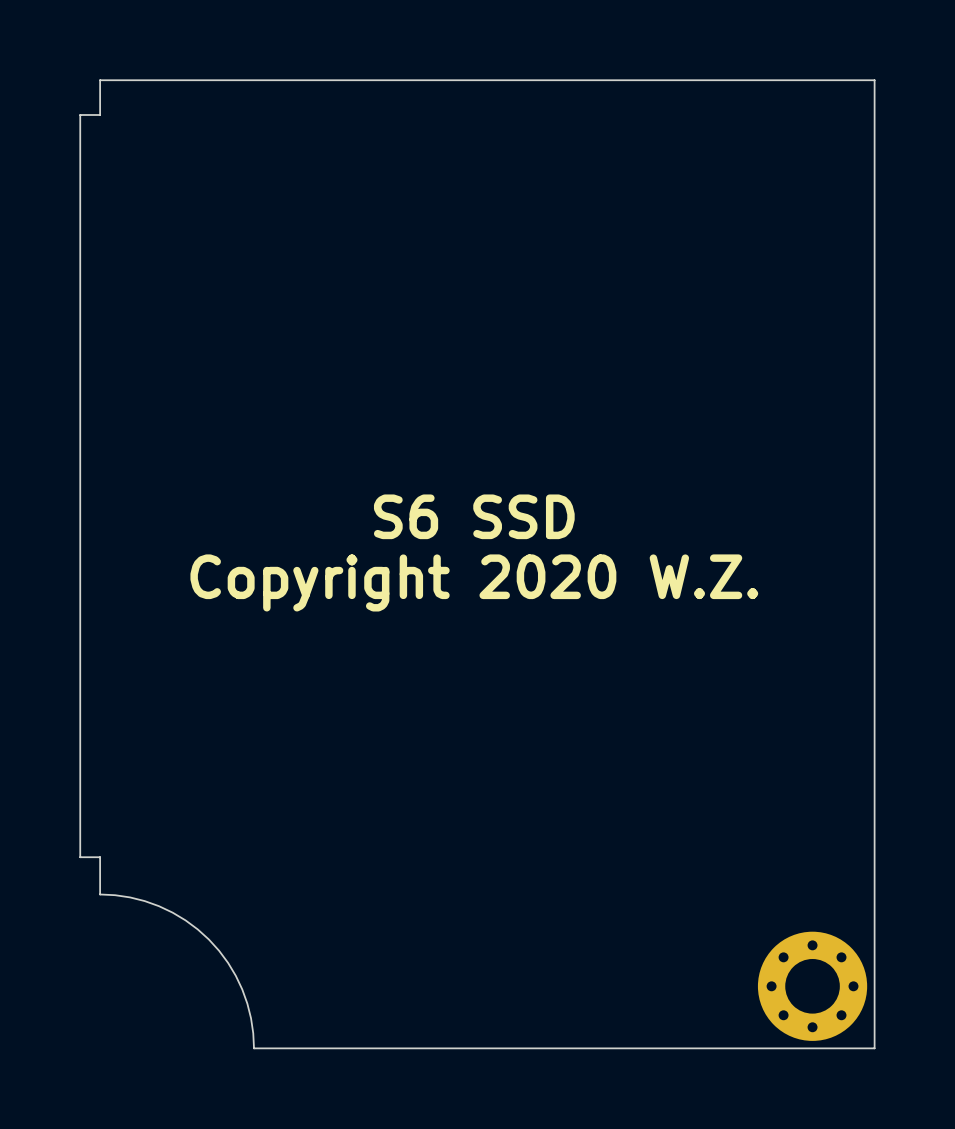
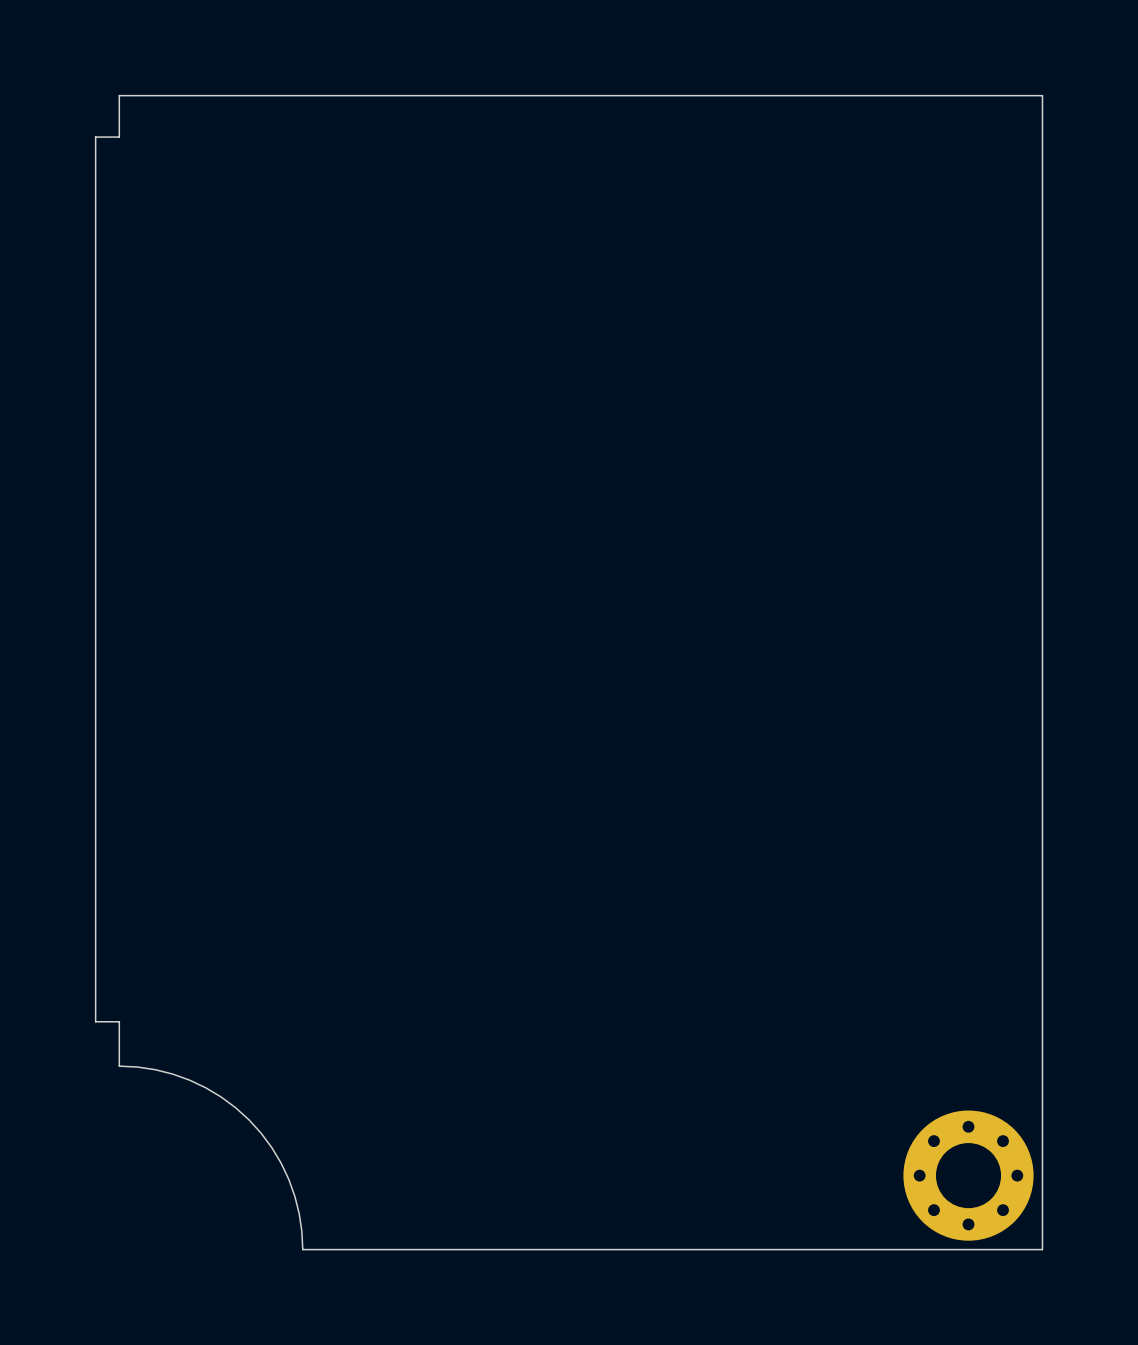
text: S6 SSD (474, 516) -> none
text: Copyright 2020 W.Z. (474, 582) -> none

